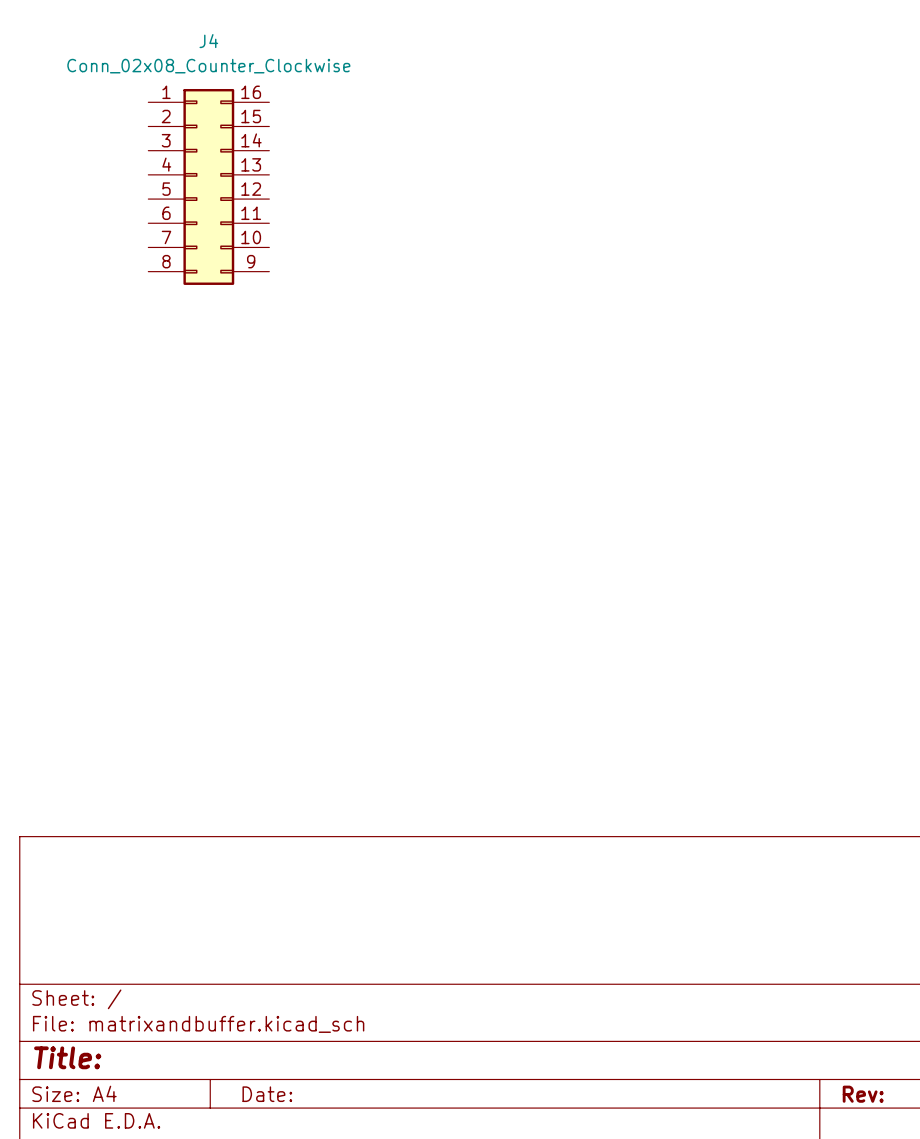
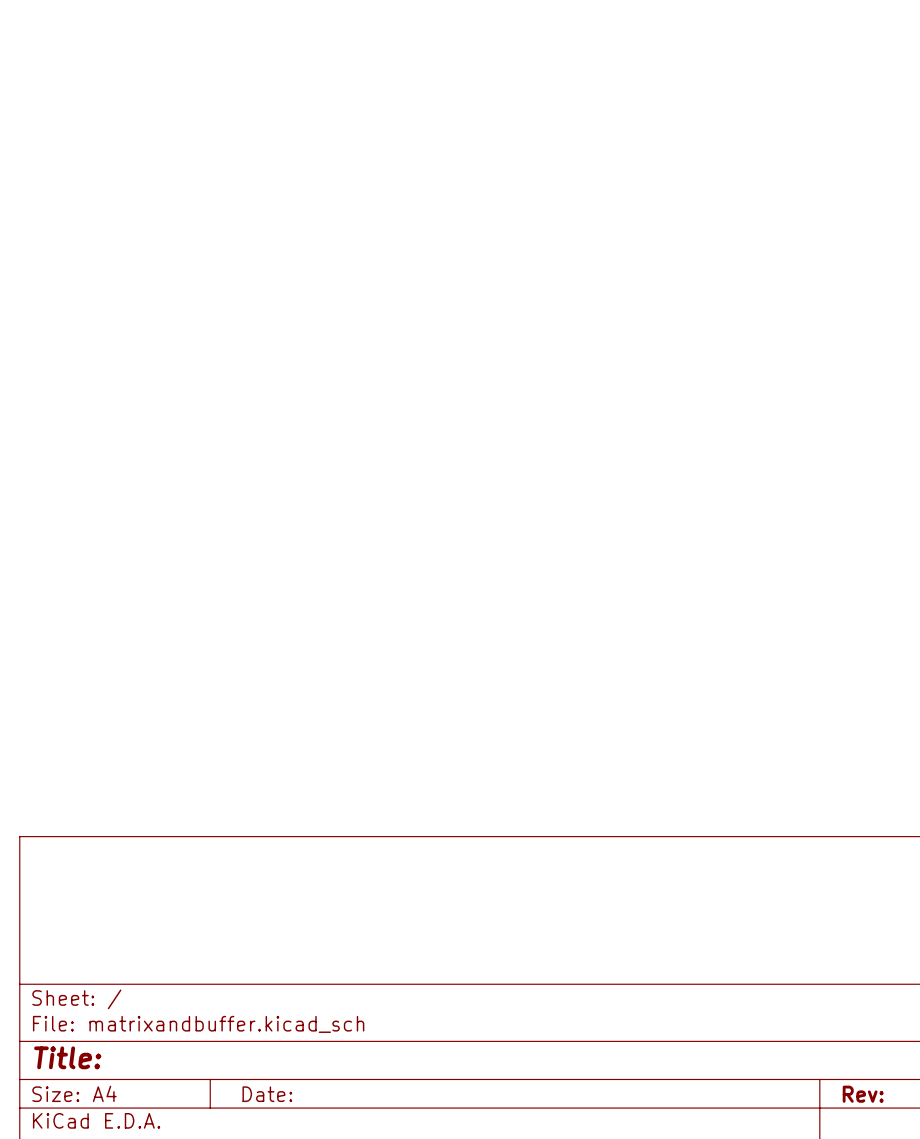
J4: Conn_02x08_Counter_Clockwise (208, 186) -> none

